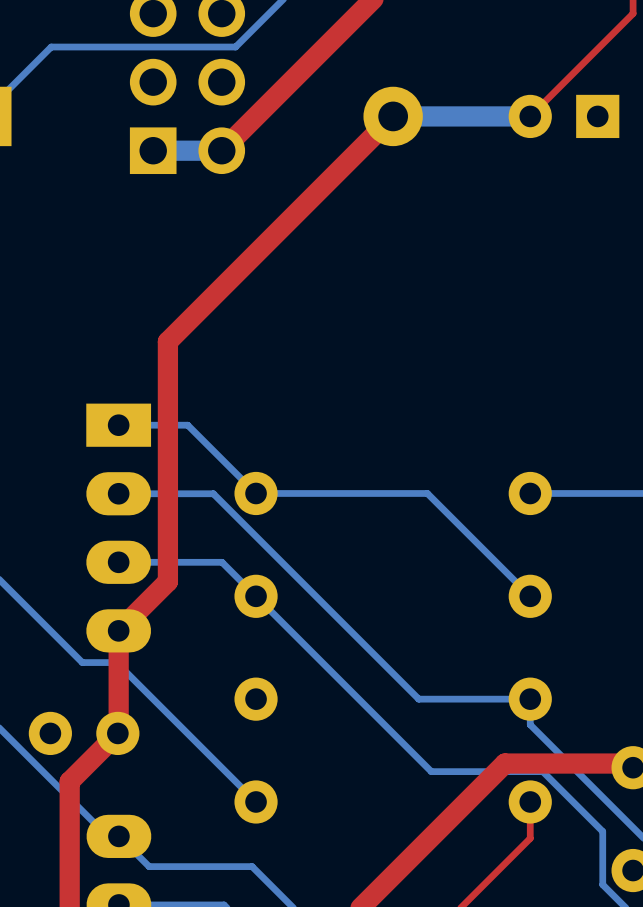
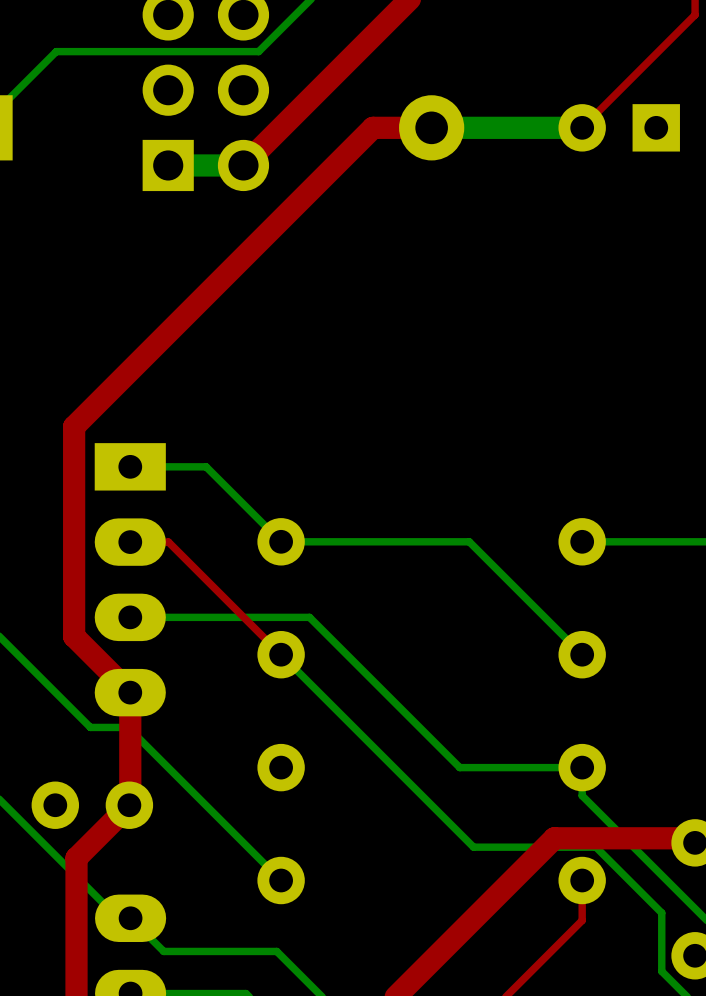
top track: (393, 116) (167, 341) (167, 581) (118, 630) -> (431, 127) (373, 127) (74, 426) (74, 636) (130, 692)
top track: none -> (130, 542) (168, 542) (281, 654)
bottom track: (118, 493) (213, 493) (281, 562) -> none
bottom track: (222, 562) (256, 596) -> (243, 617) (309, 617)

